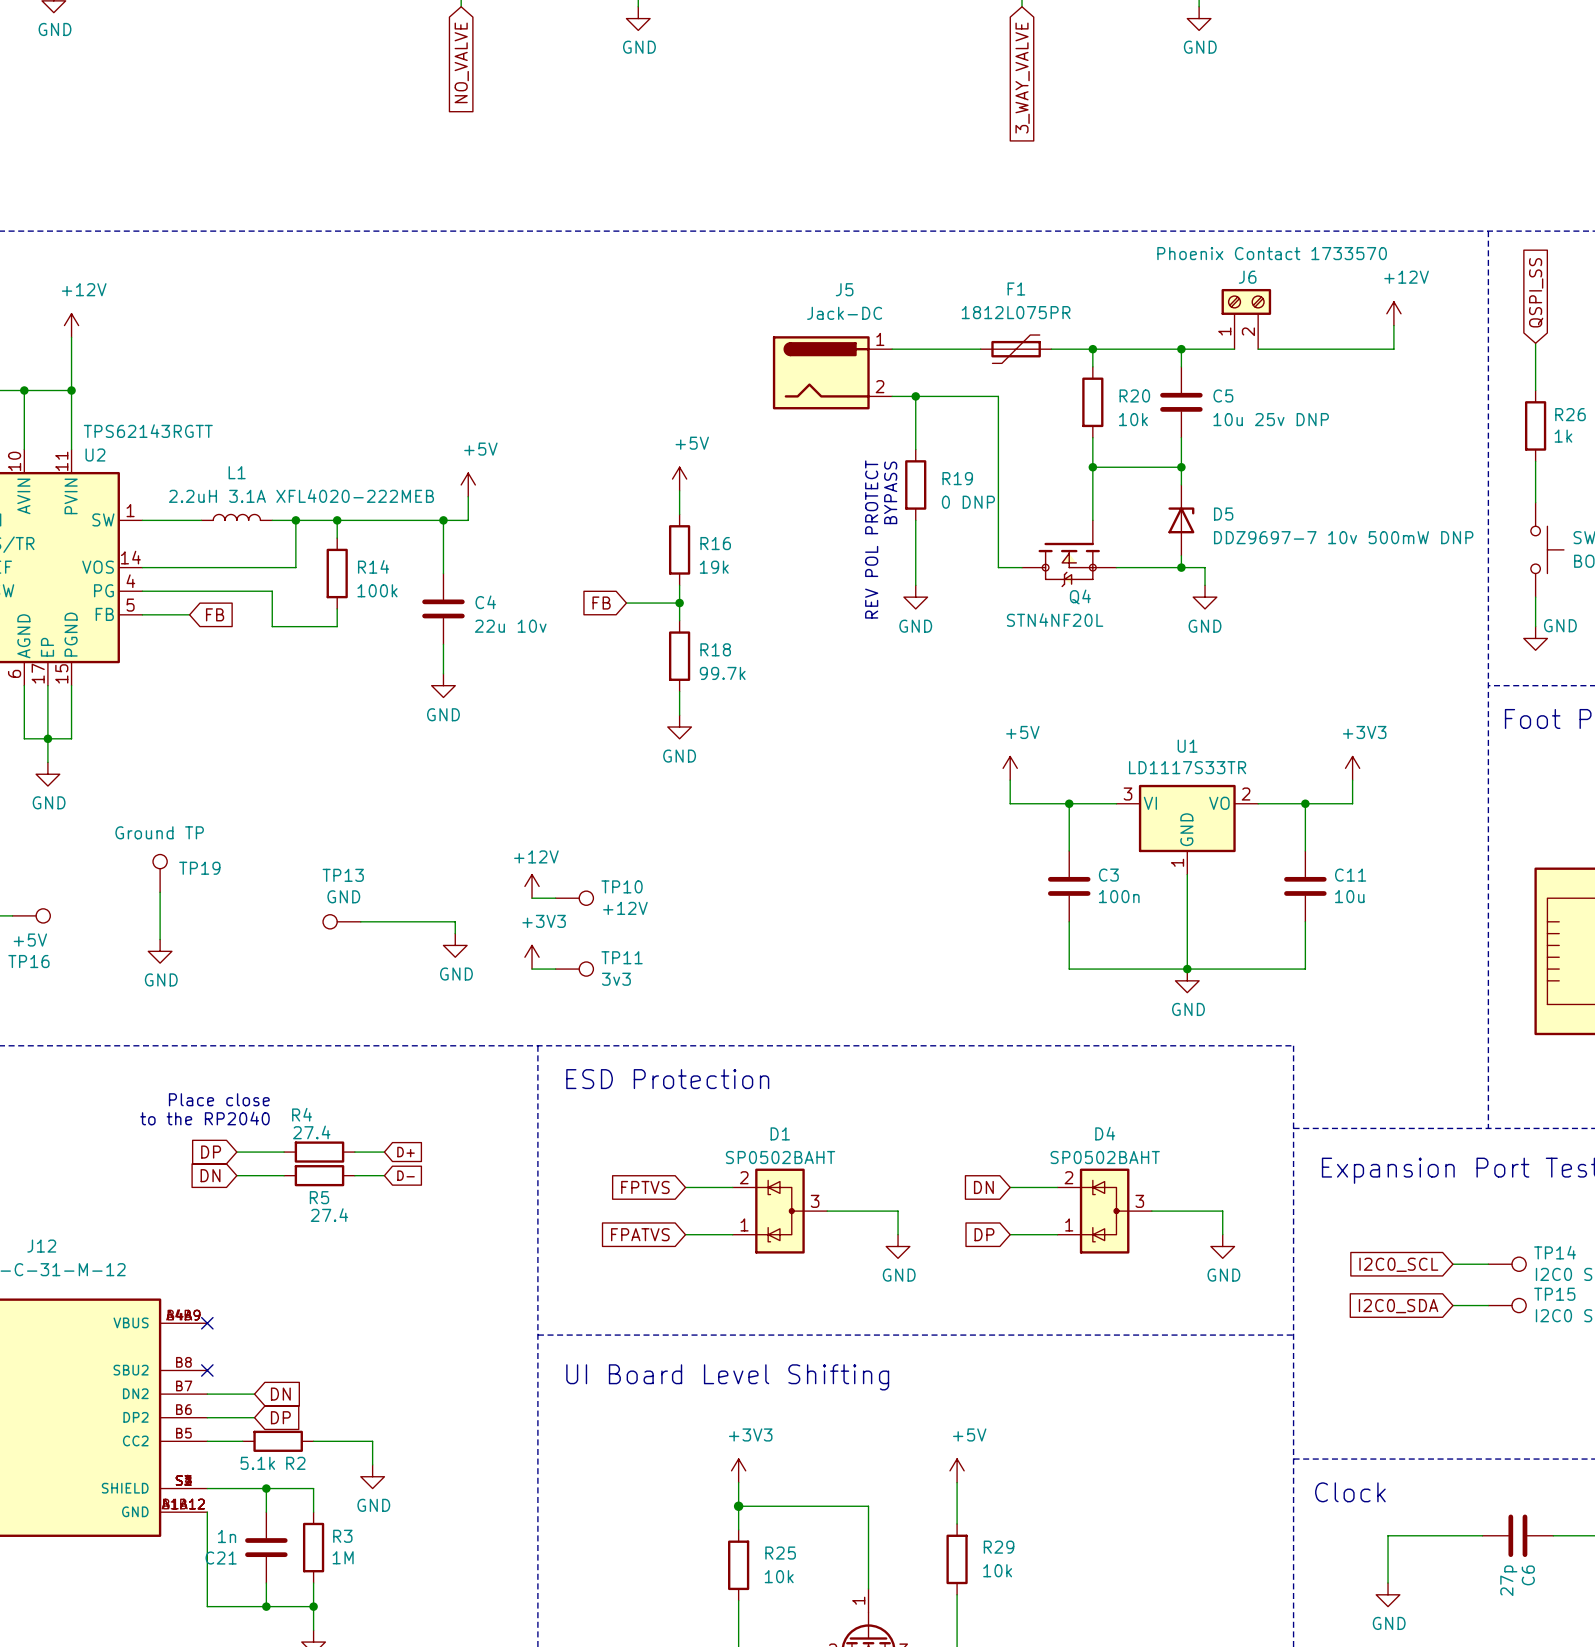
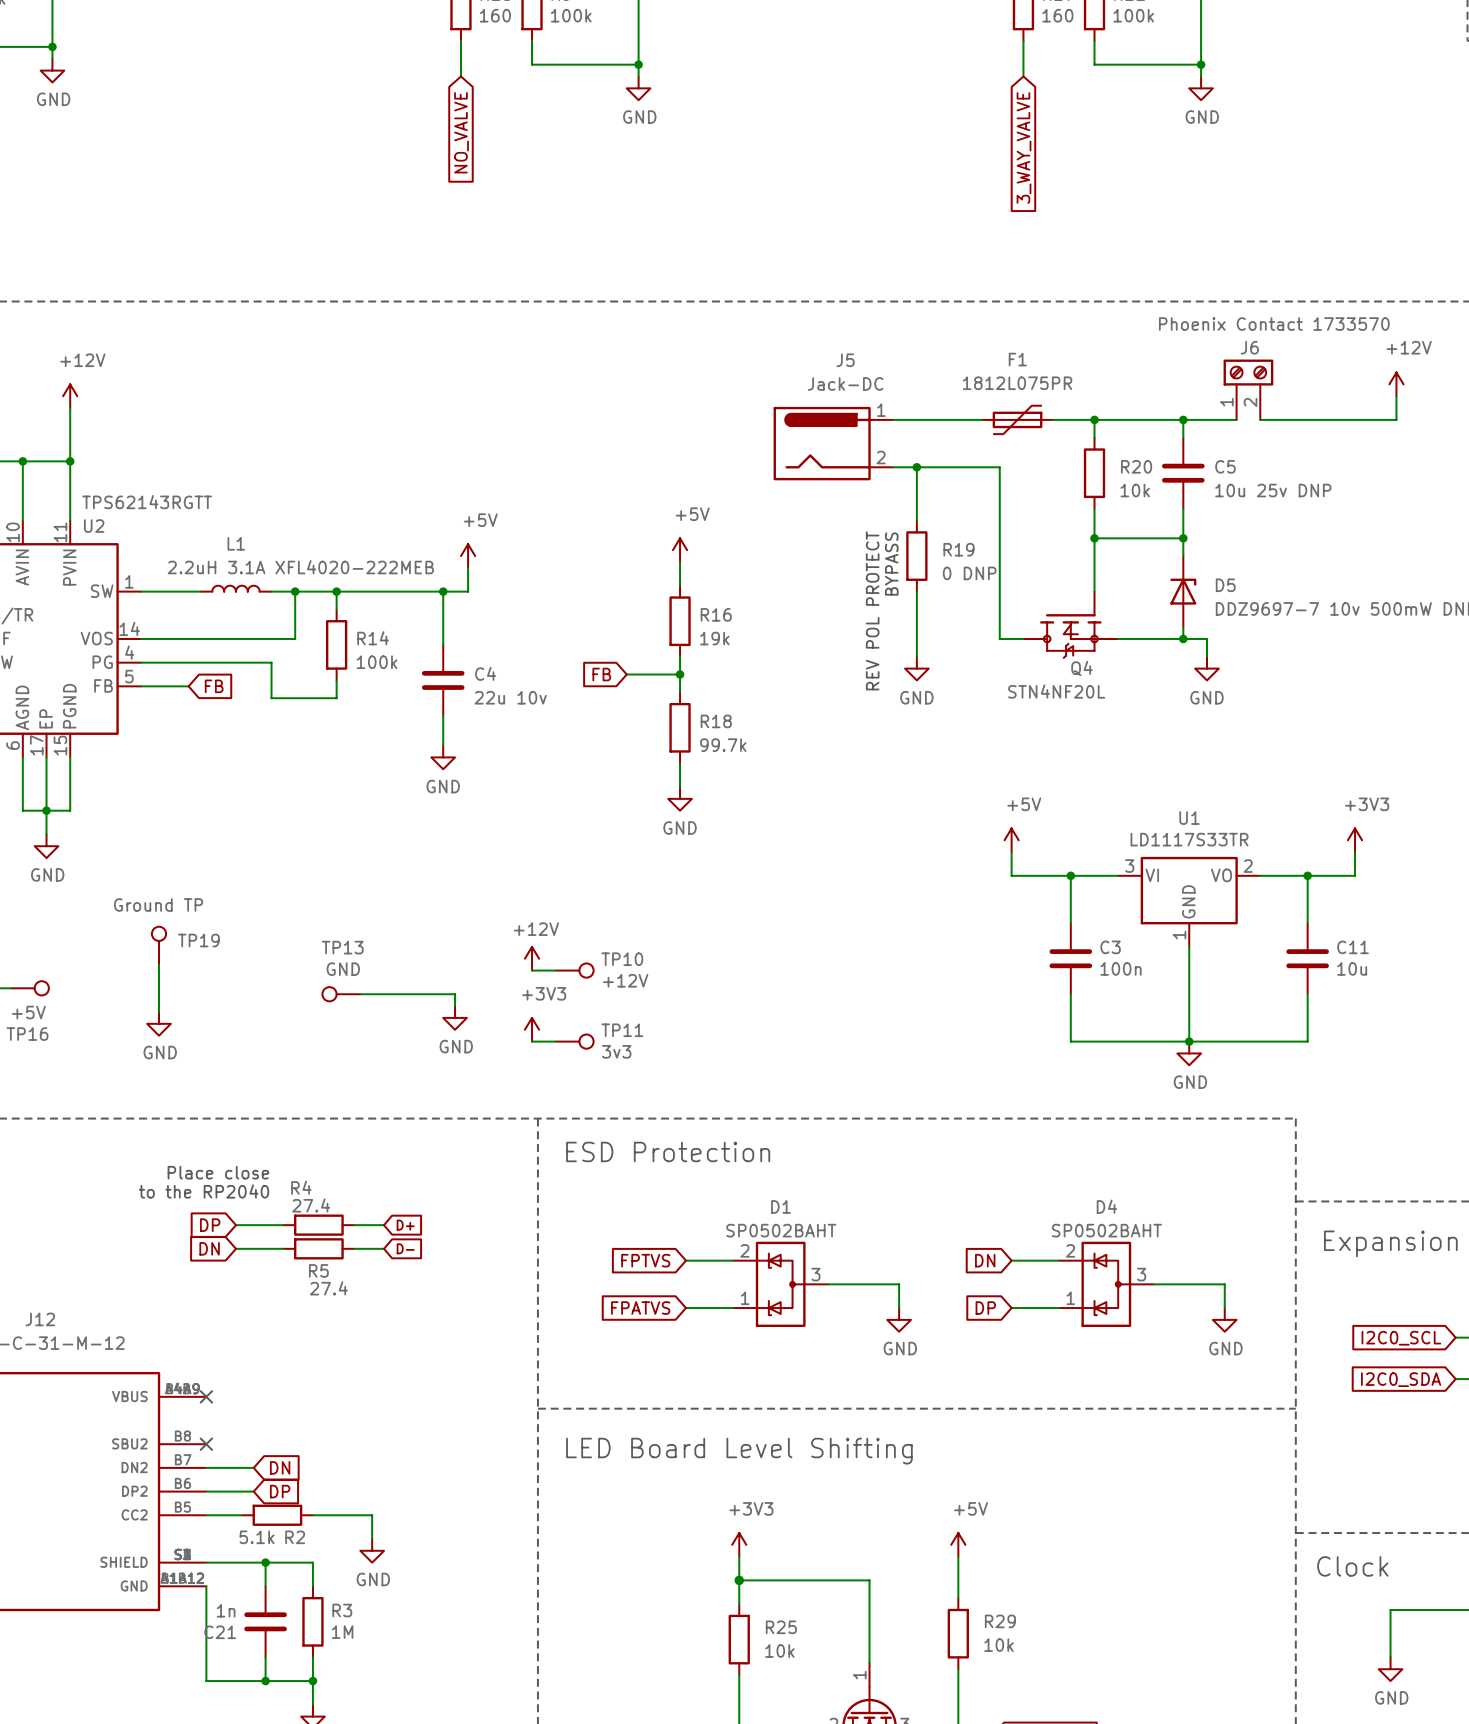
text: UI Board Level Shifting (727, 1377) -> LED Board Level Shifting (739, 1451)

